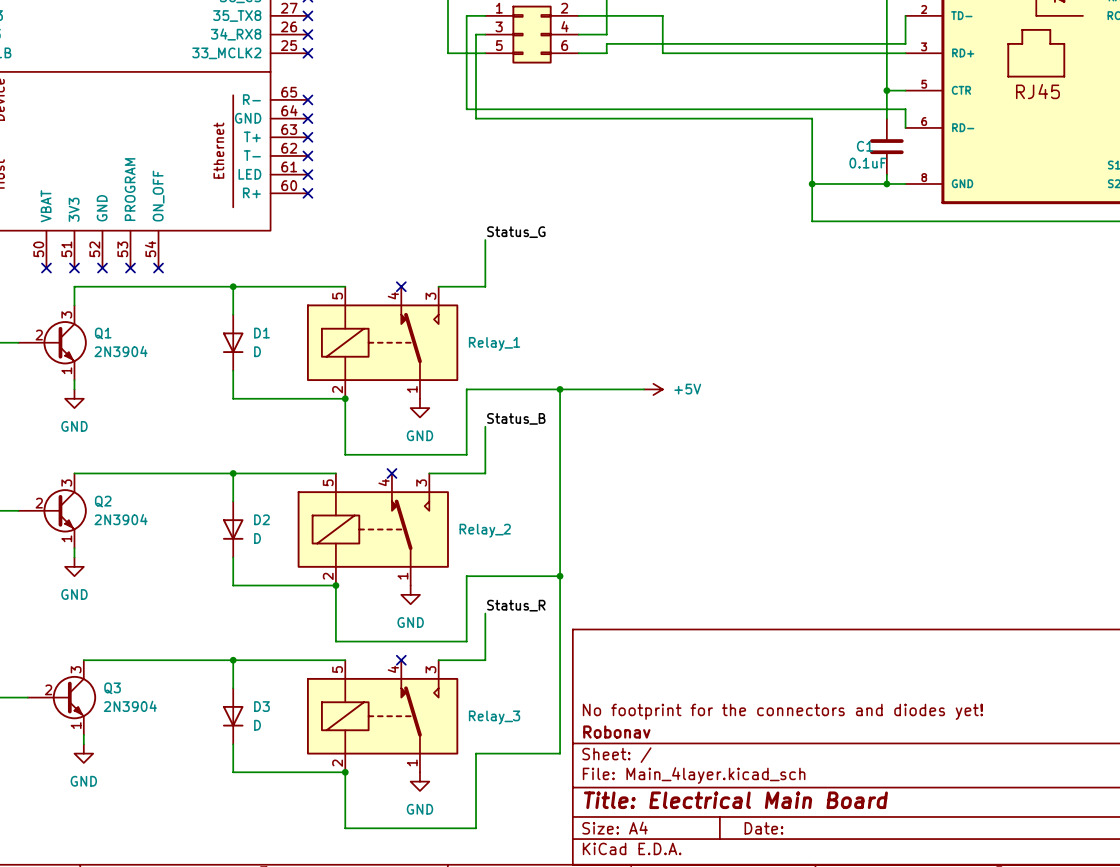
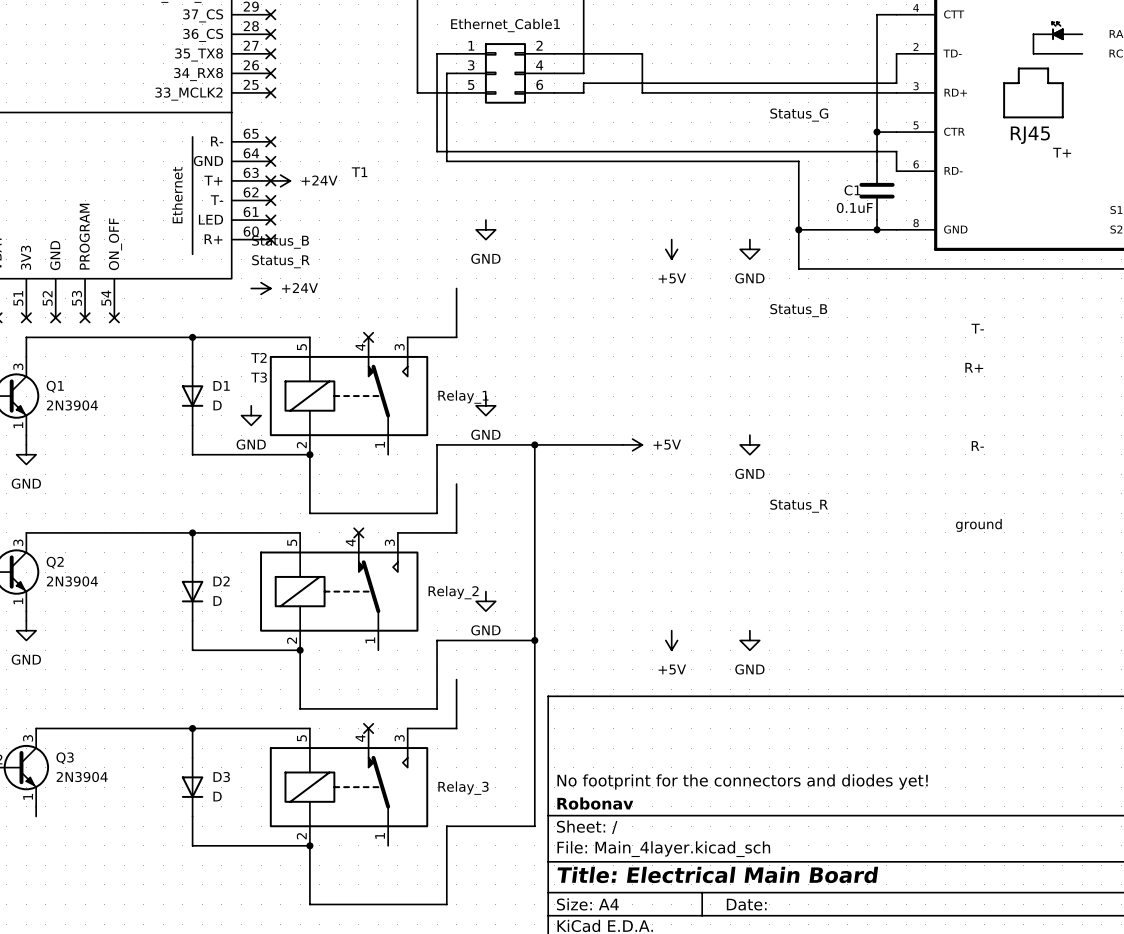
label: none -> Status_G (799, 115)
label: none -> T+ (1062, 152)
label: none -> T1 (359, 172)
power symbol: none -> +24V (280, 180)
power symbol: none -> GND (485, 229)
label: none -> Status_B (280, 242)
power symbol: none -> +5V (671, 249)
power symbol: none -> GND (749, 249)
label: none -> Status_R (280, 261)
label: Status_G (516, 232) -> none
power symbol: none -> +24V (261, 288)
label: none -> Status_B (798, 310)
label: none -> T- (977, 328)
label: none -> T2 (258, 357)
label: none -> R+ (974, 367)
label: none -> T3 (259, 377)
power symbol: none -> GND (485, 405)
power symbol: none -> GND (251, 415)
power symbol: none -> GND (749, 444)
label: none -> R- (977, 445)
power symbol: GND (419, 408) -> none
label: Status_B (516, 418) -> none
label: none -> Status_R (799, 506)
label: none -> ground (978, 525)
power symbol: none -> GND (485, 601)
power symbol: none -> +5V (671, 640)
power symbol: none -> GND (749, 640)
power symbol: GND (410, 594) -> none
label: Status_R (516, 605) -> none
power symbol: GND (83, 753) -> none
power symbol: GND (419, 781) -> none

